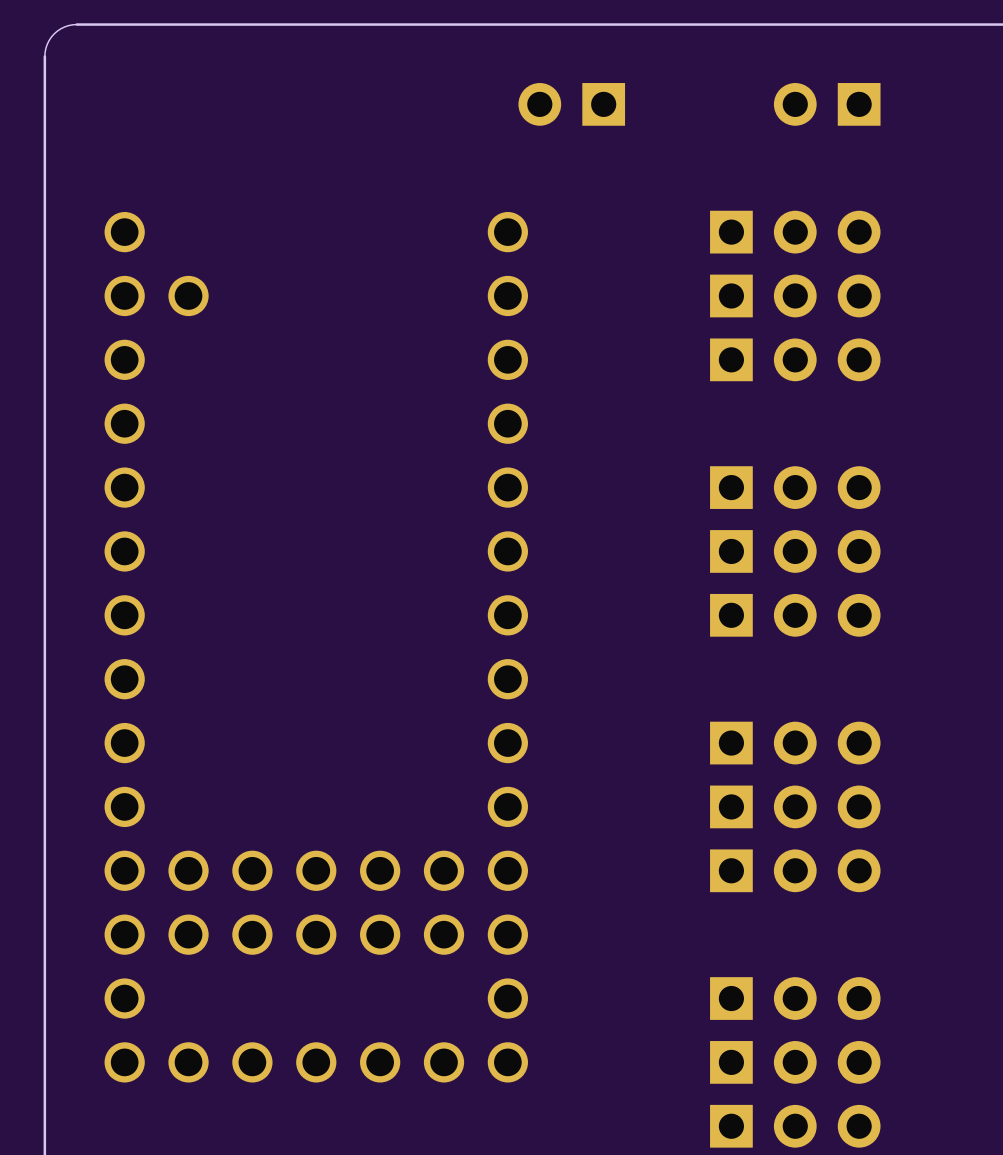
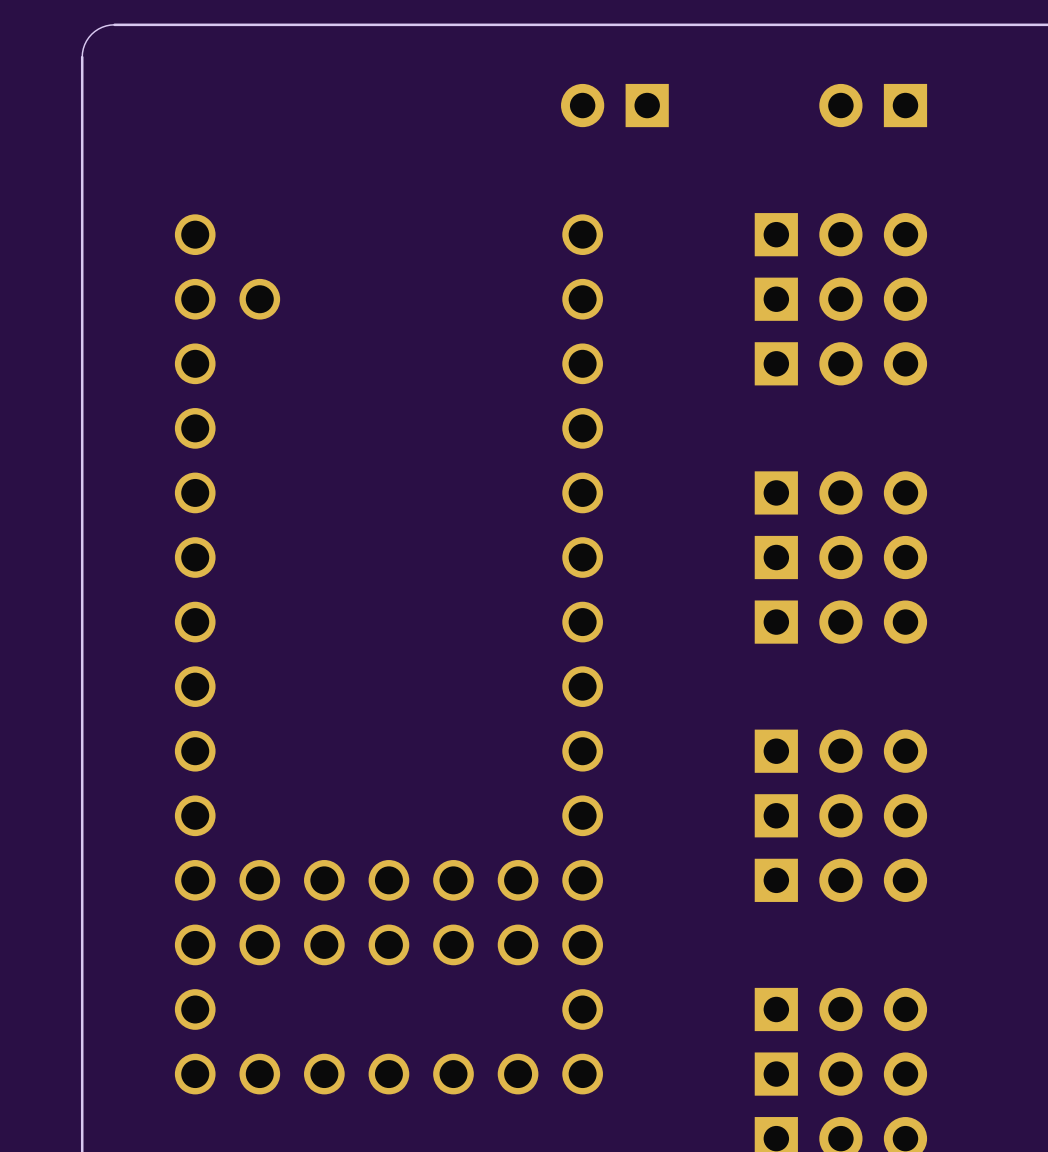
part position: (316, 647) -> (388, 654)

